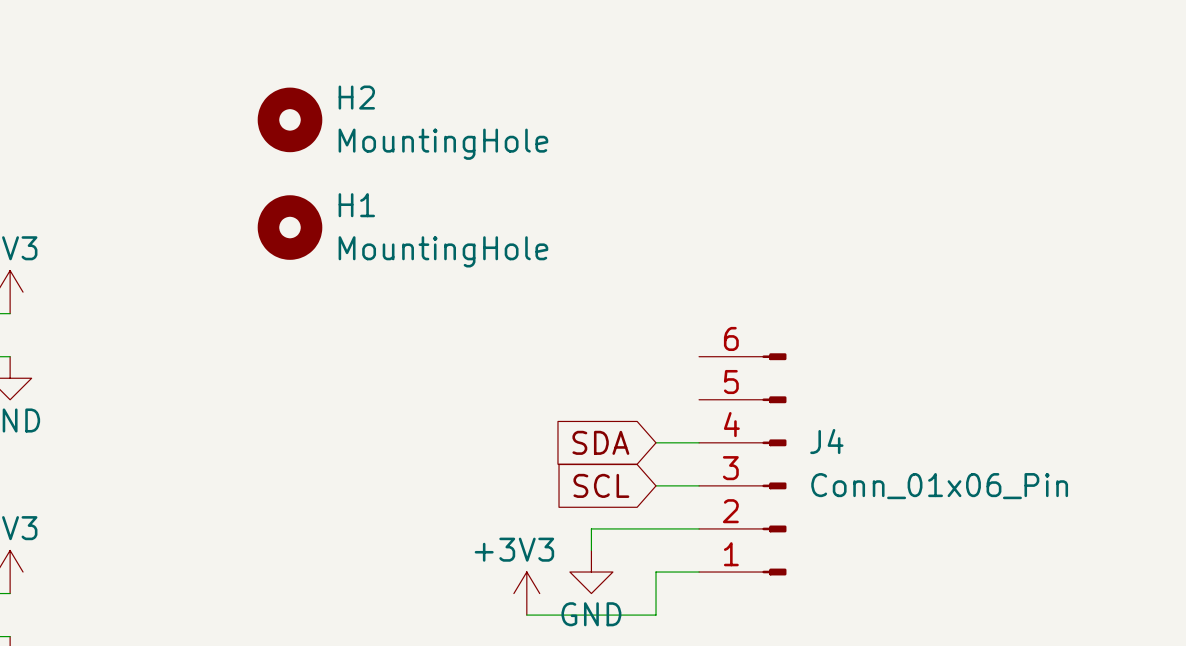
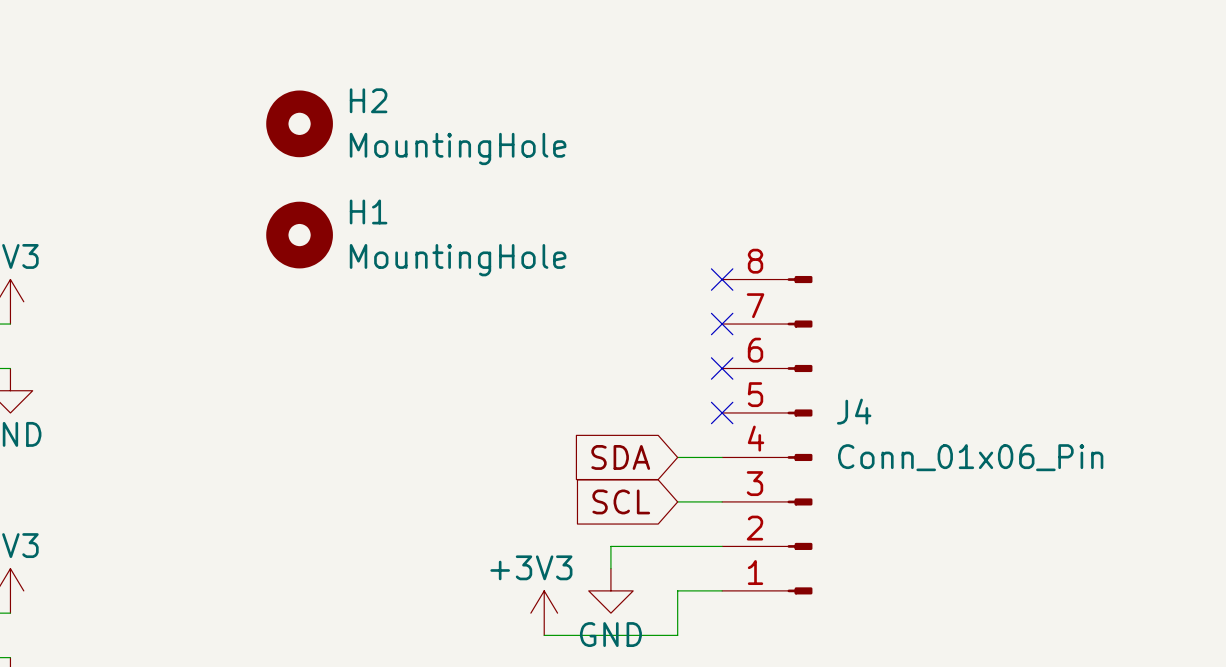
no-connect mark: none -> (722, 279)
no-connect mark: none -> (722, 324)
J4 symbol: [699, 353, 787, 576] -> [722, 275, 813, 595]
no-connect mark: none -> (722, 368)
no-connect mark: none -> (722, 412)

